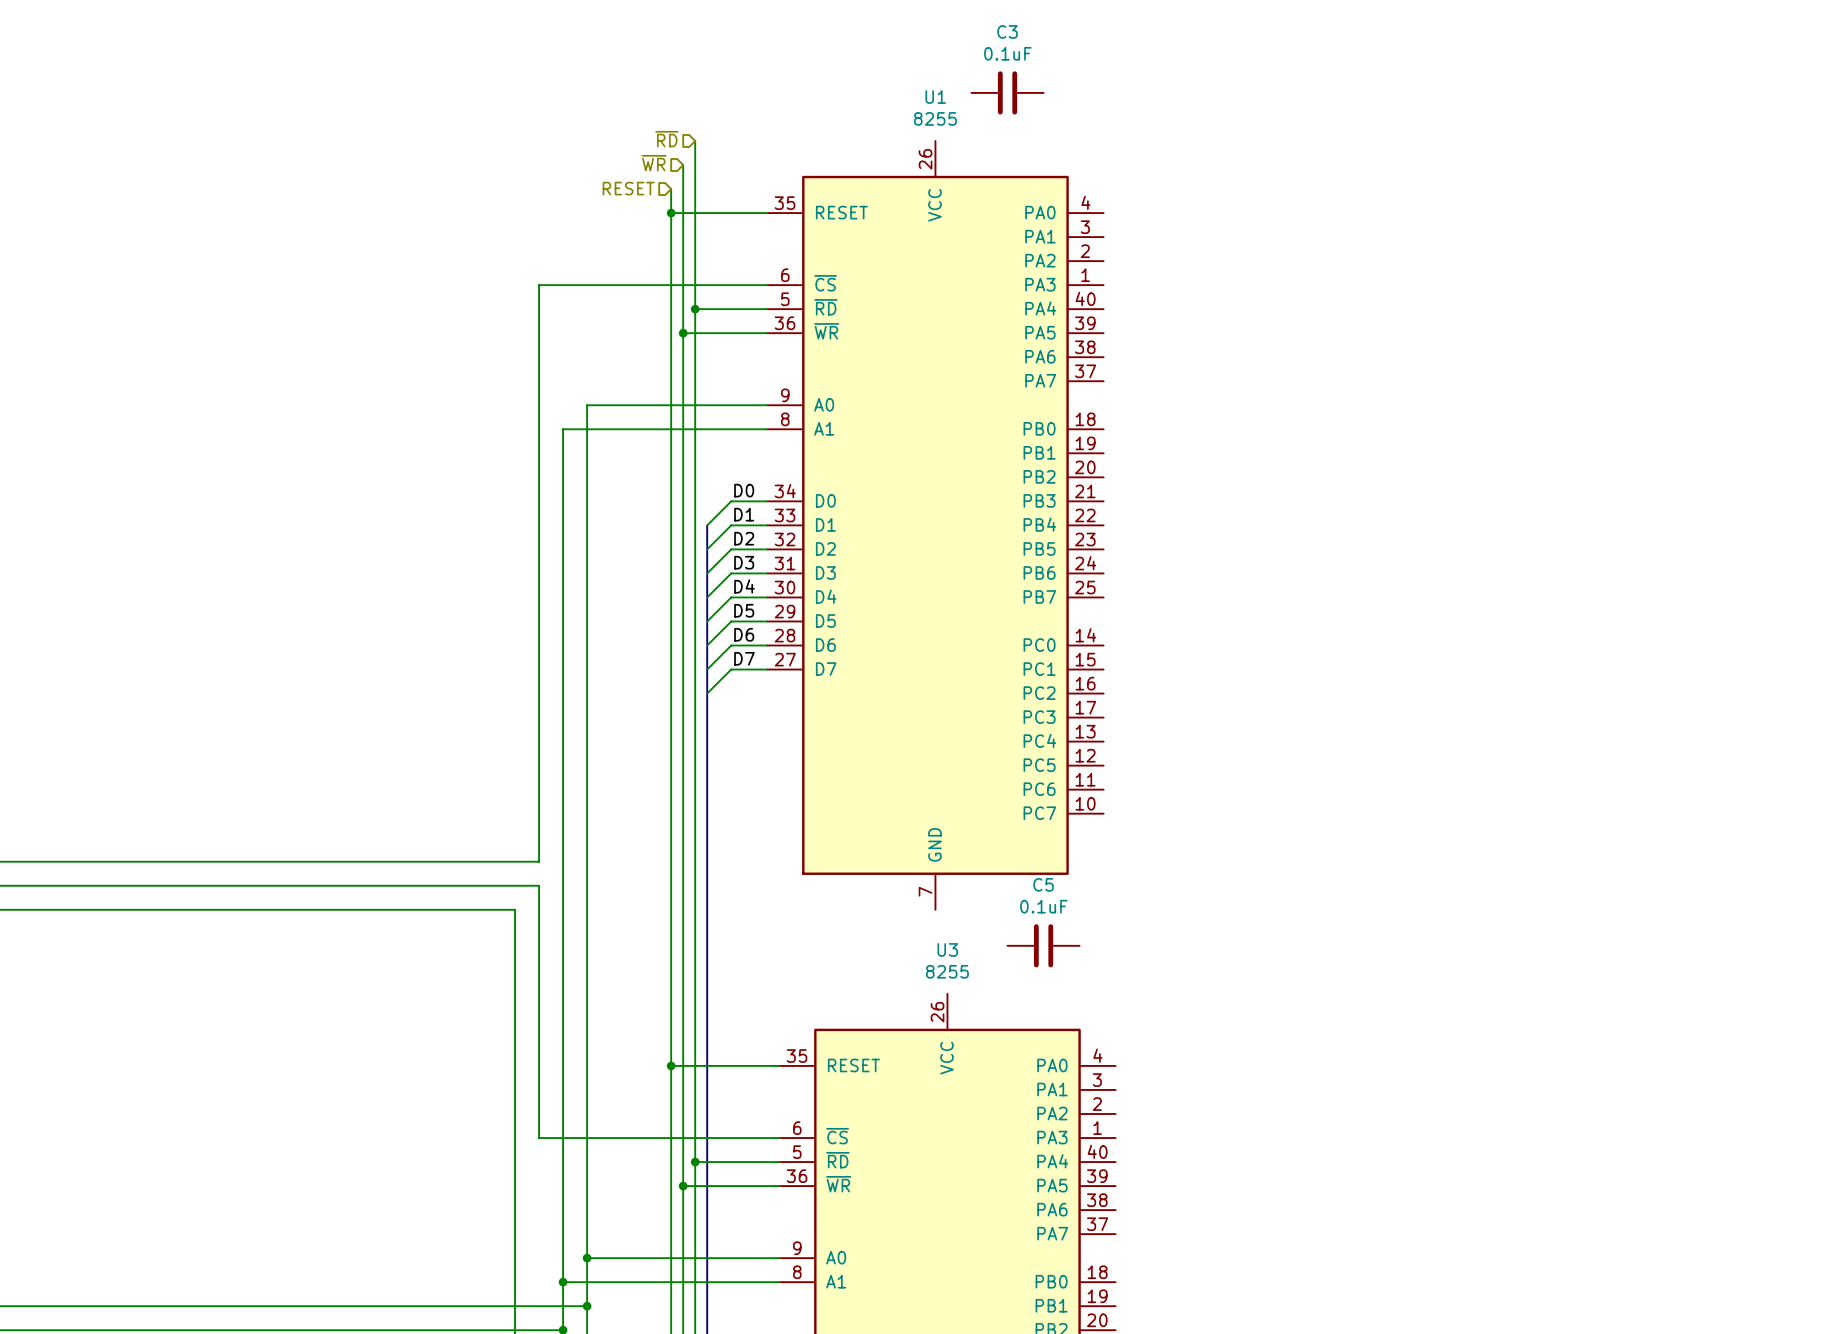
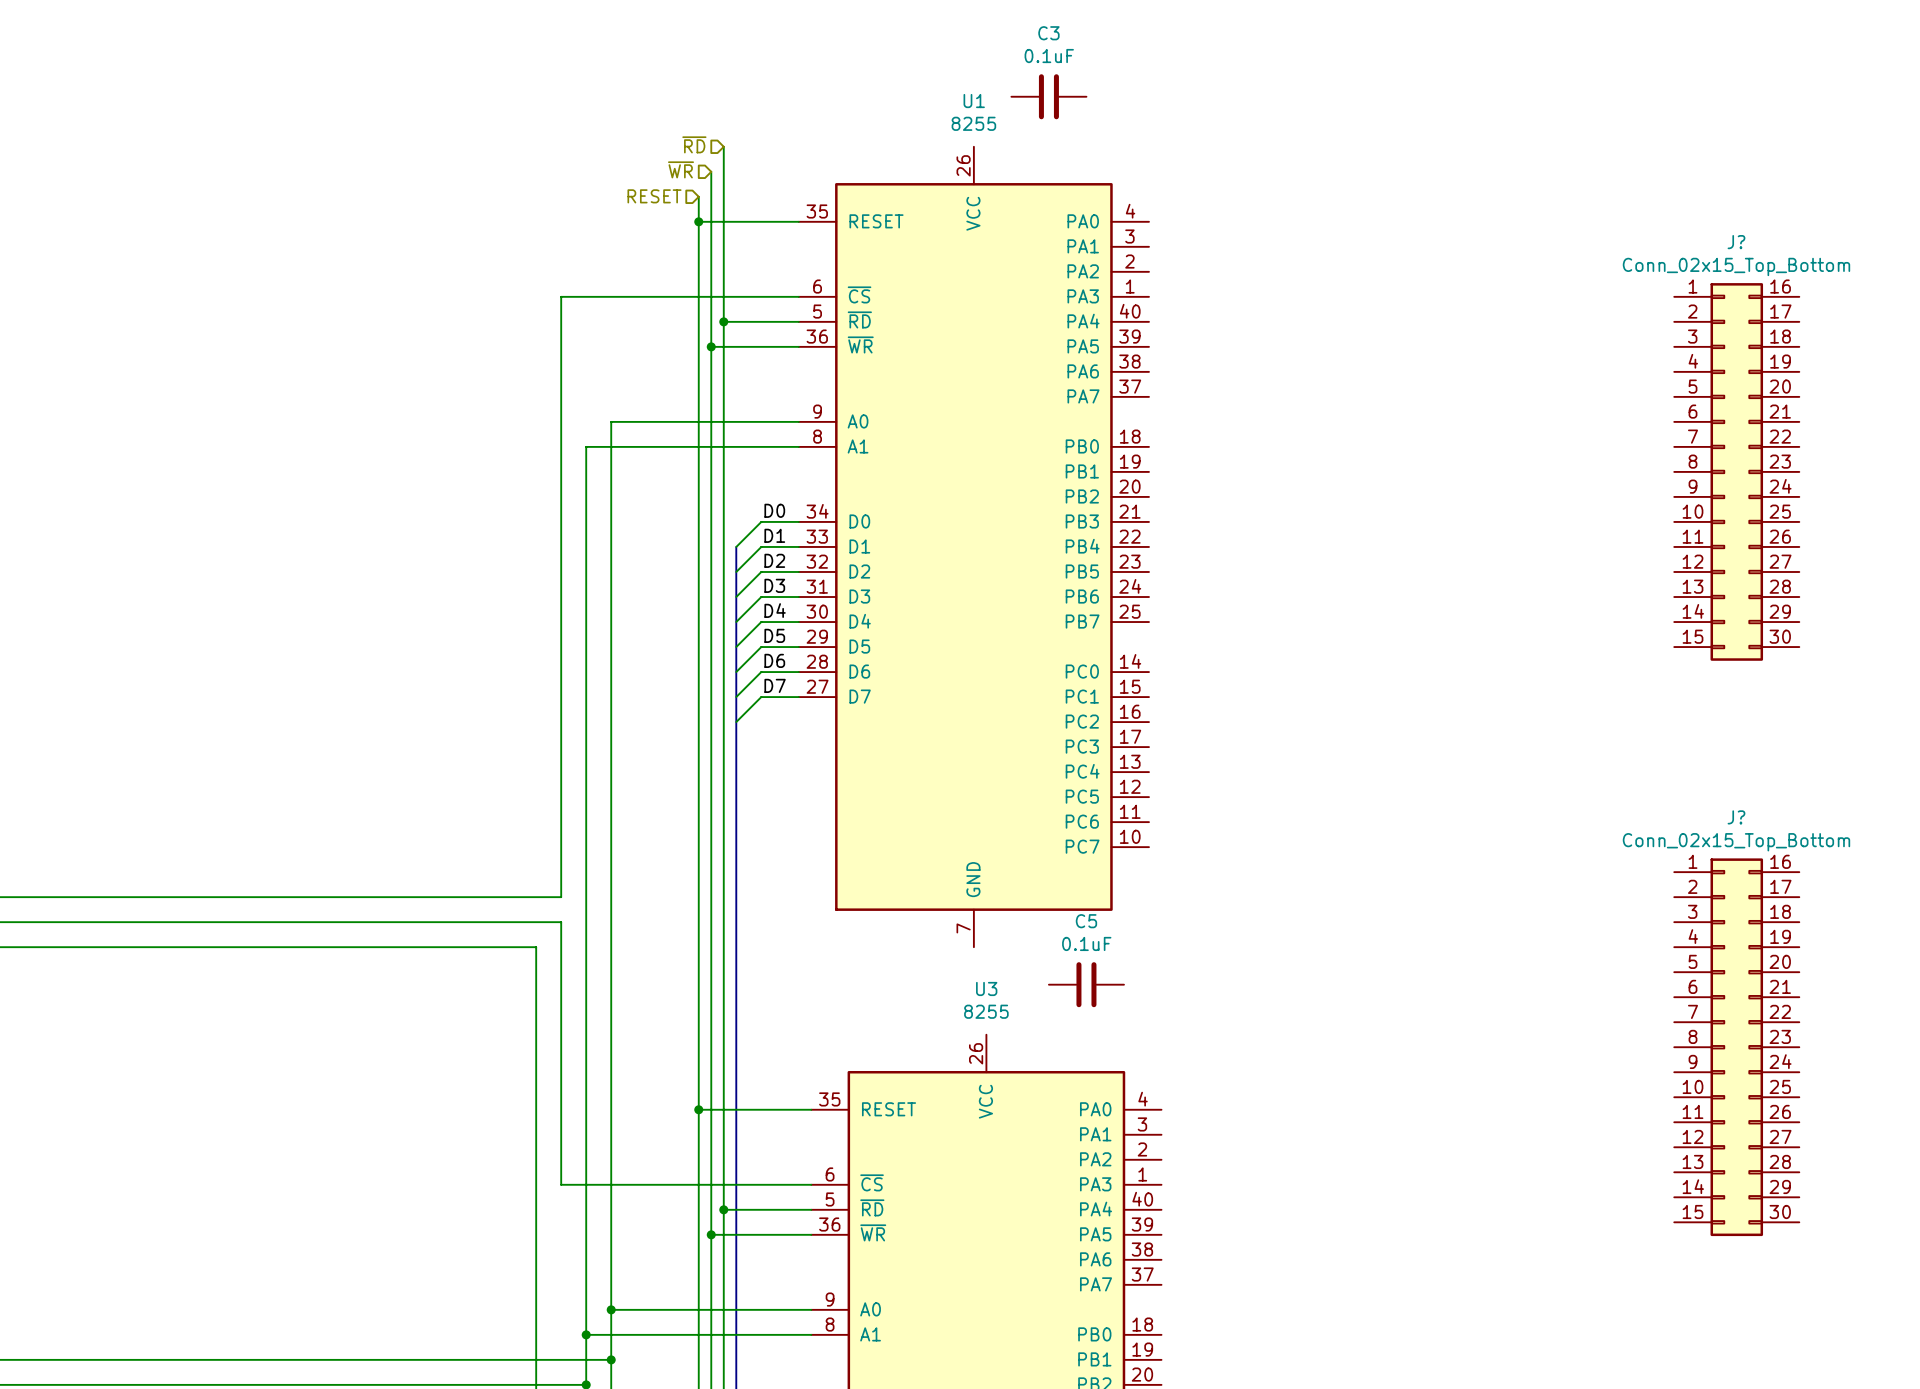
J?: none -> Conn_02x15_Top_Bottom (1736, 471)
J?: none -> Conn_02x15_Top_Bottom (1736, 1047)

